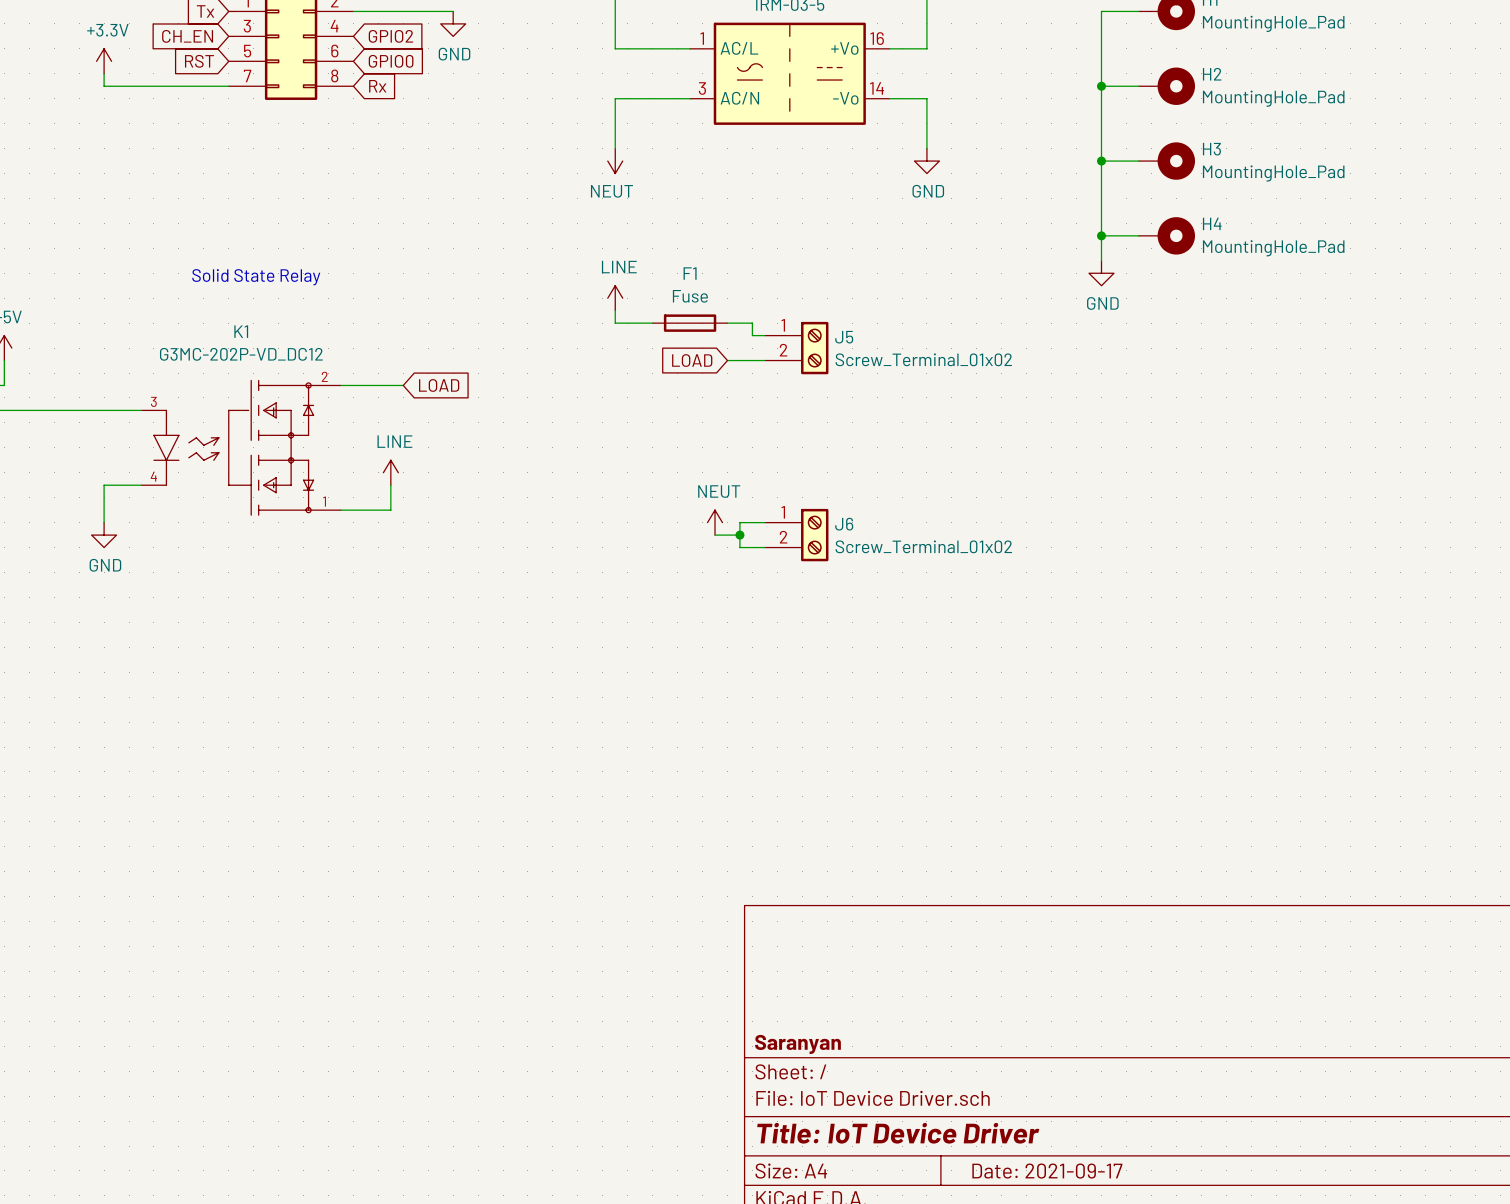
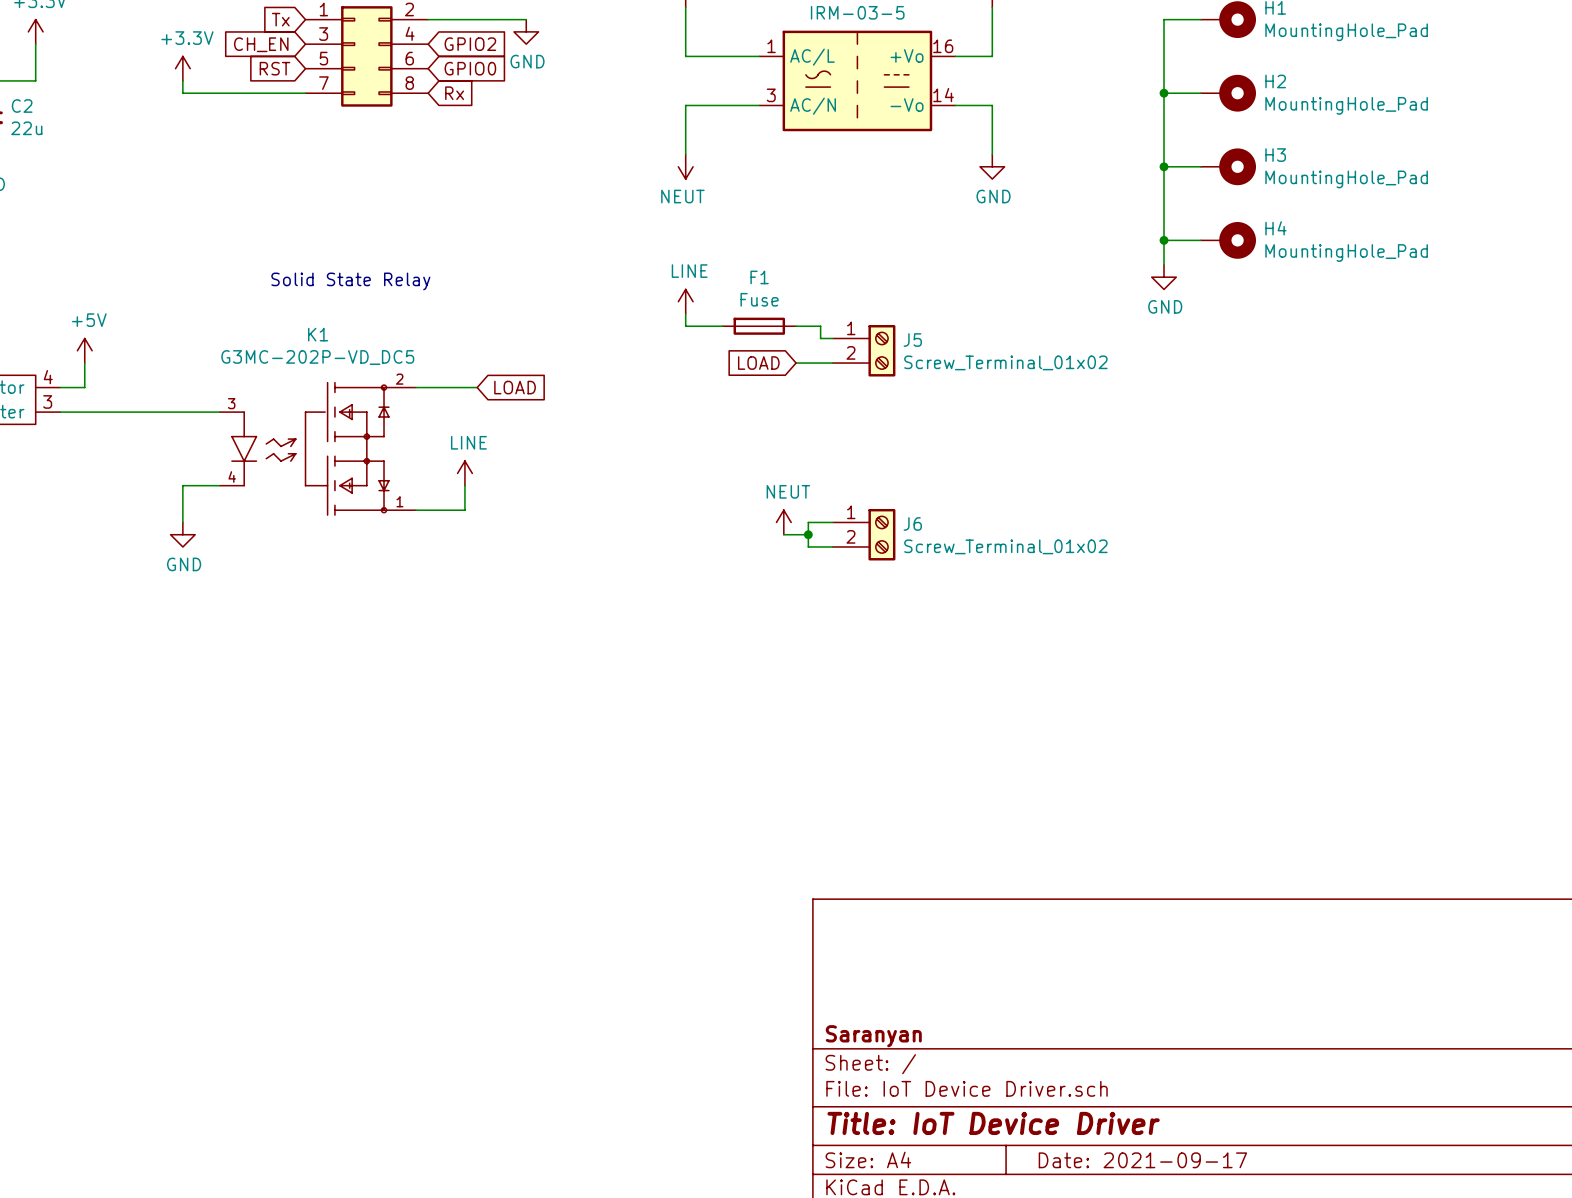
K1 value: G3MC-202P-VD_DC12 (241, 354) -> G3MC-202P-VD_DC5 (317, 357)

